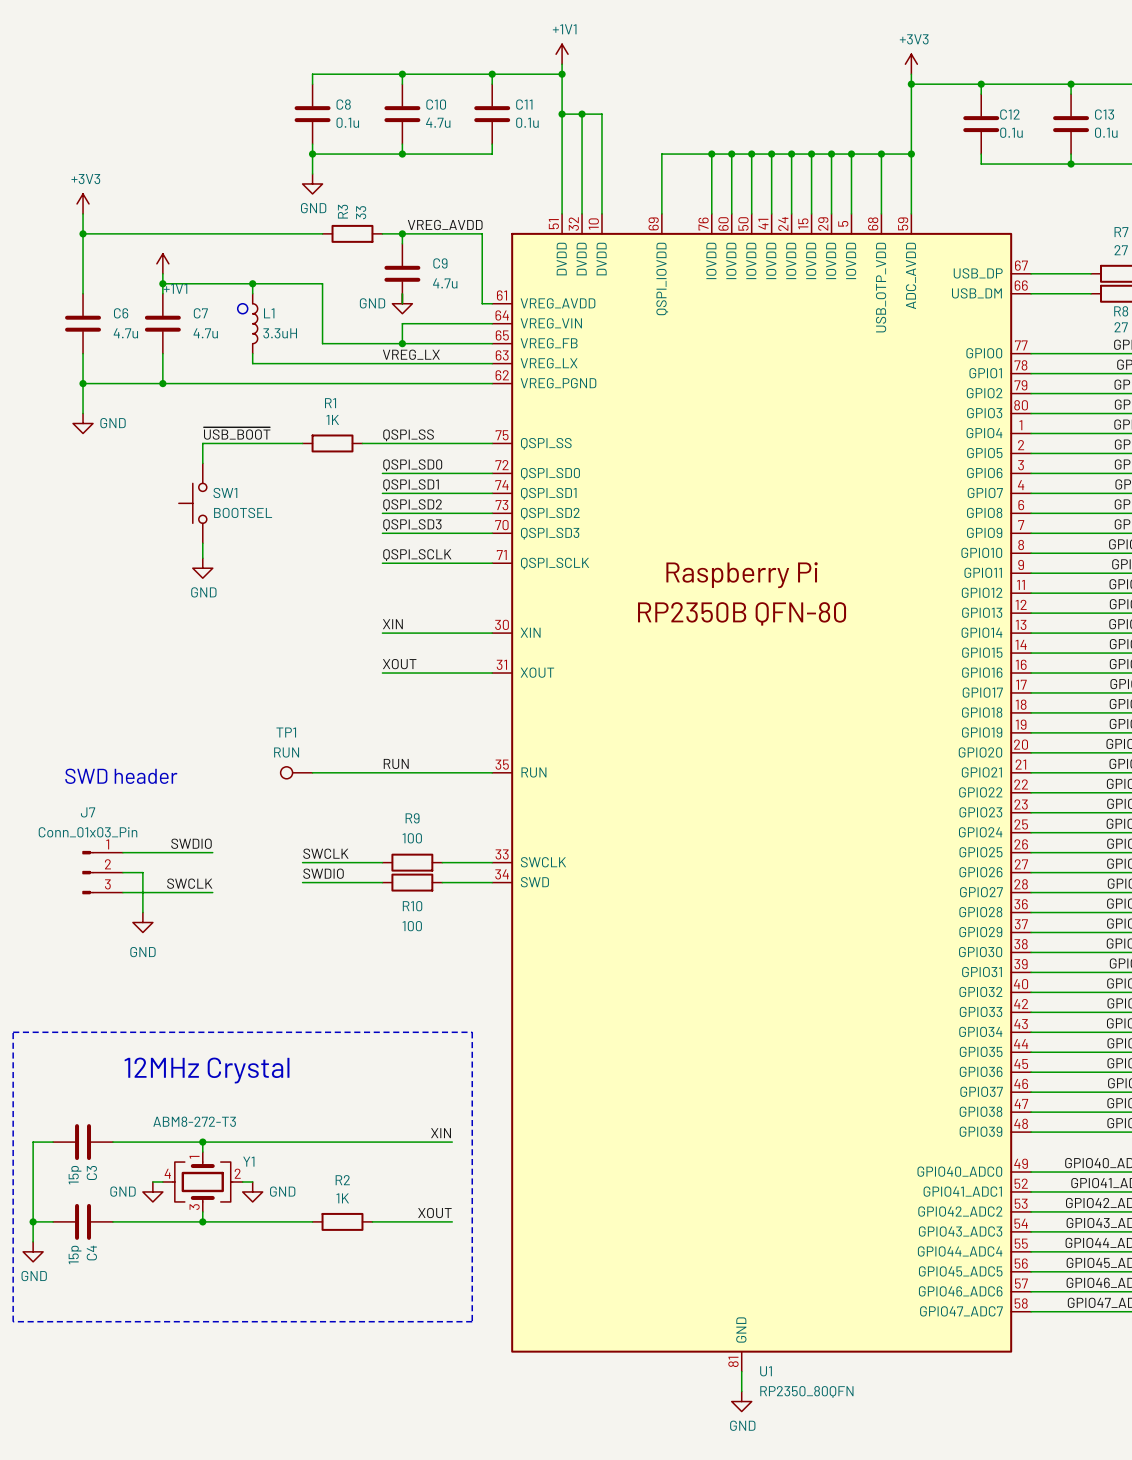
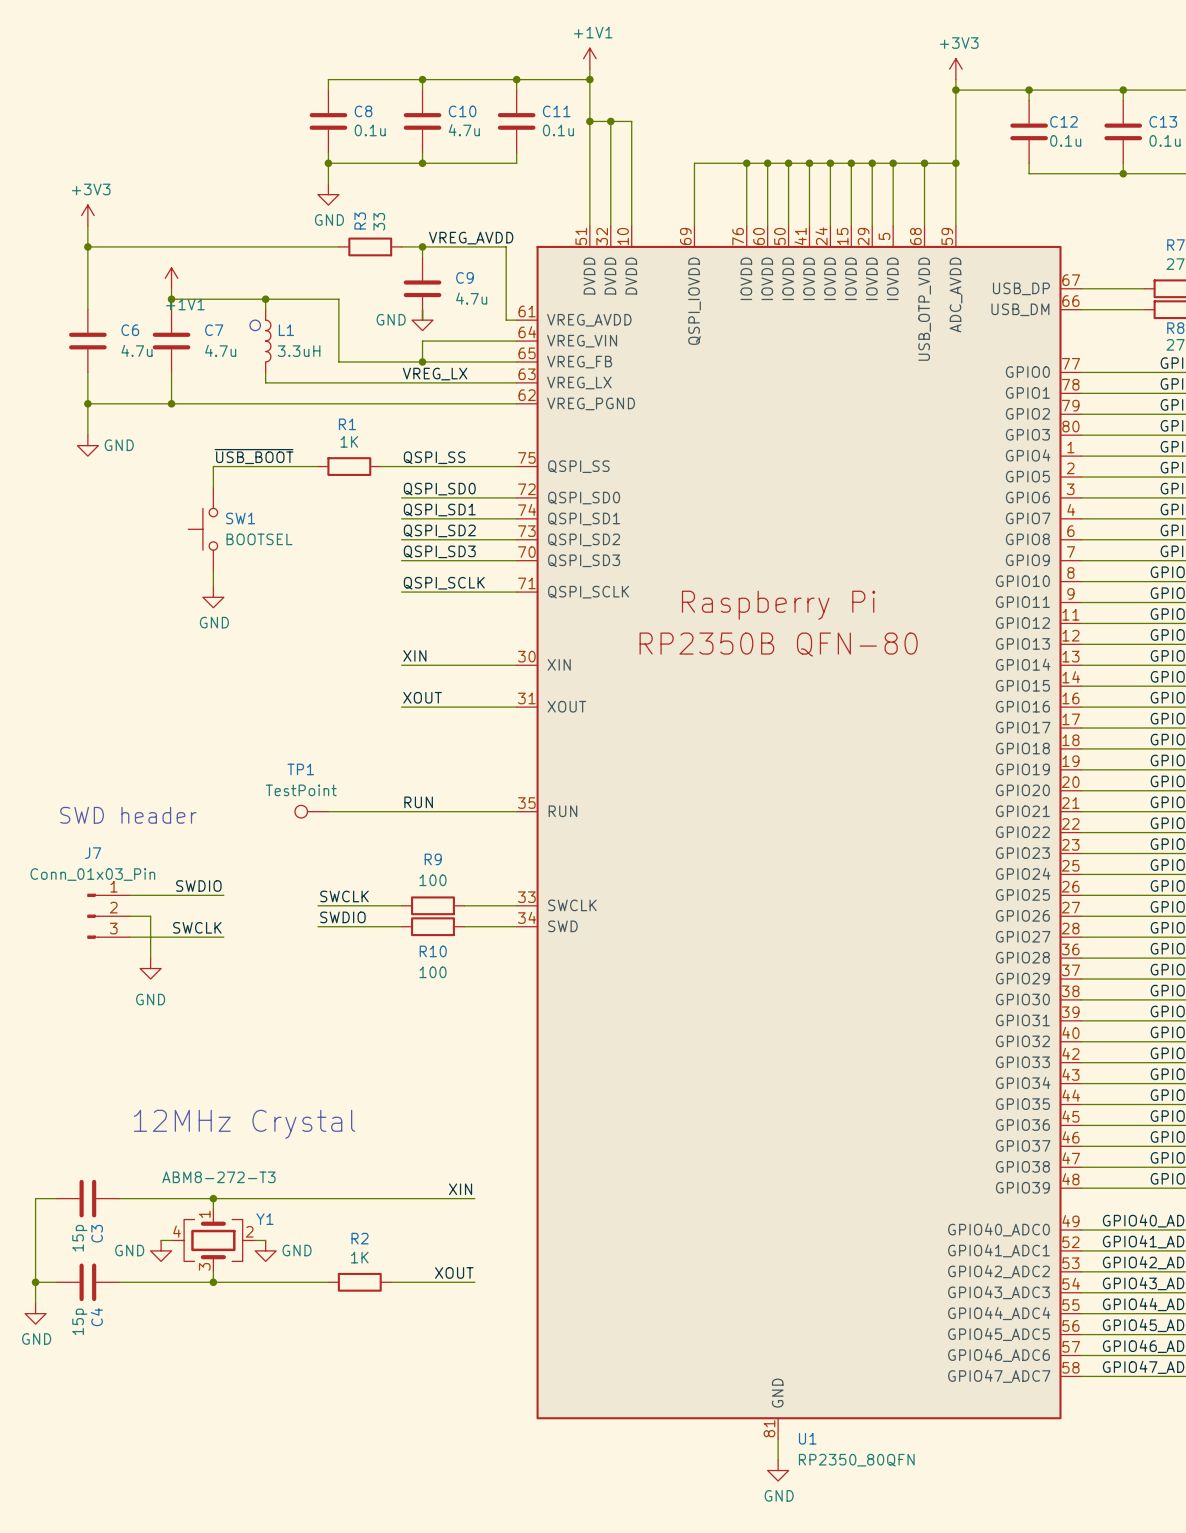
TP1 value: RUN (286, 752) -> TestPoint (301, 790)
line: (13, 1032) (472, 1032) (472, 1321) (13, 1321) (13, 1032) -> none

